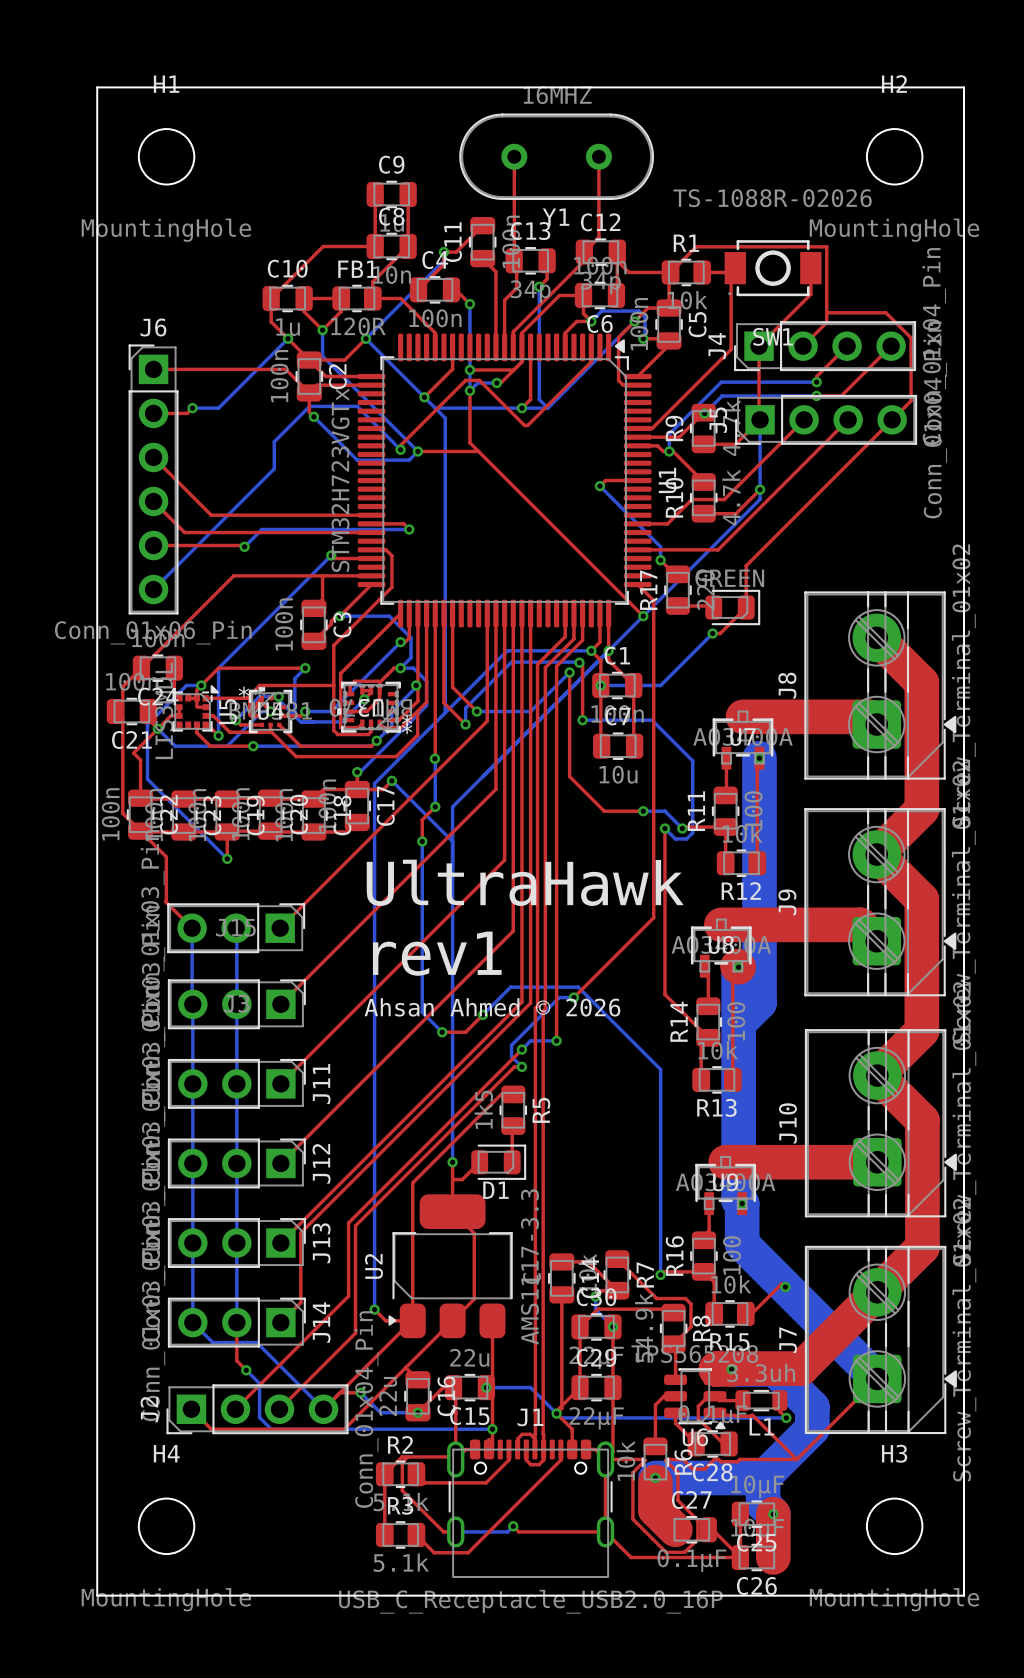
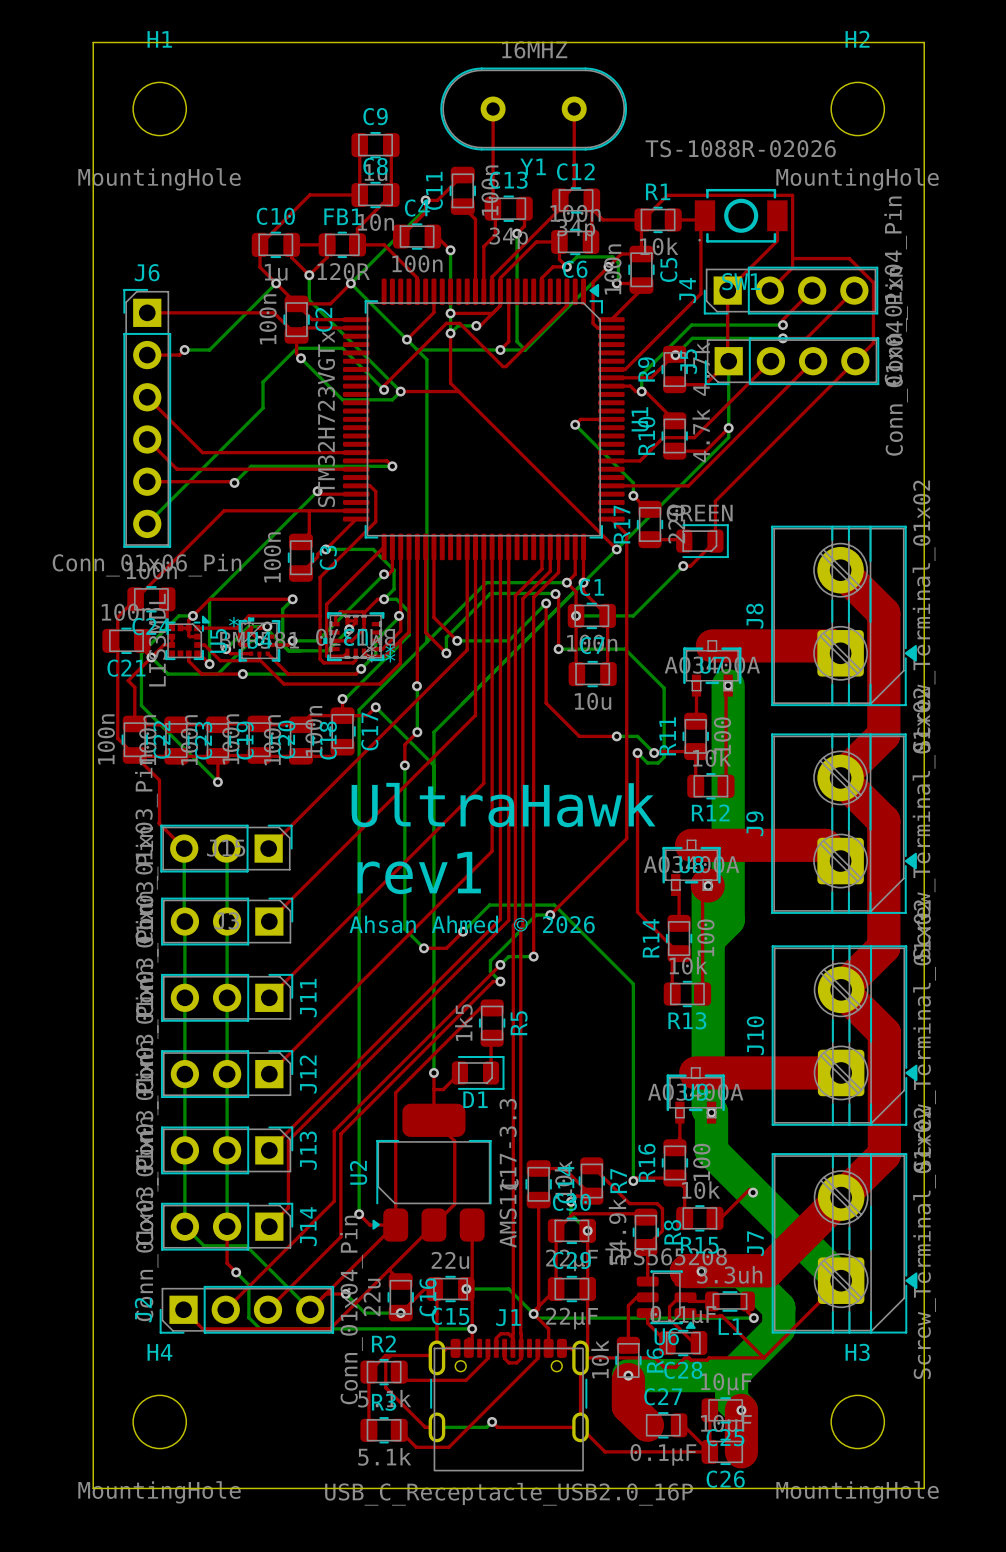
top track: (642, 1459) (645, 1460) (632, 1472) (632, 1519) (666, 1552) (684, 1552) (697, 1539) (697, 1520) (677, 1500) (677, 1472) (665, 1460) (668, 1459) -> (616, 1357) (640, 1357)

